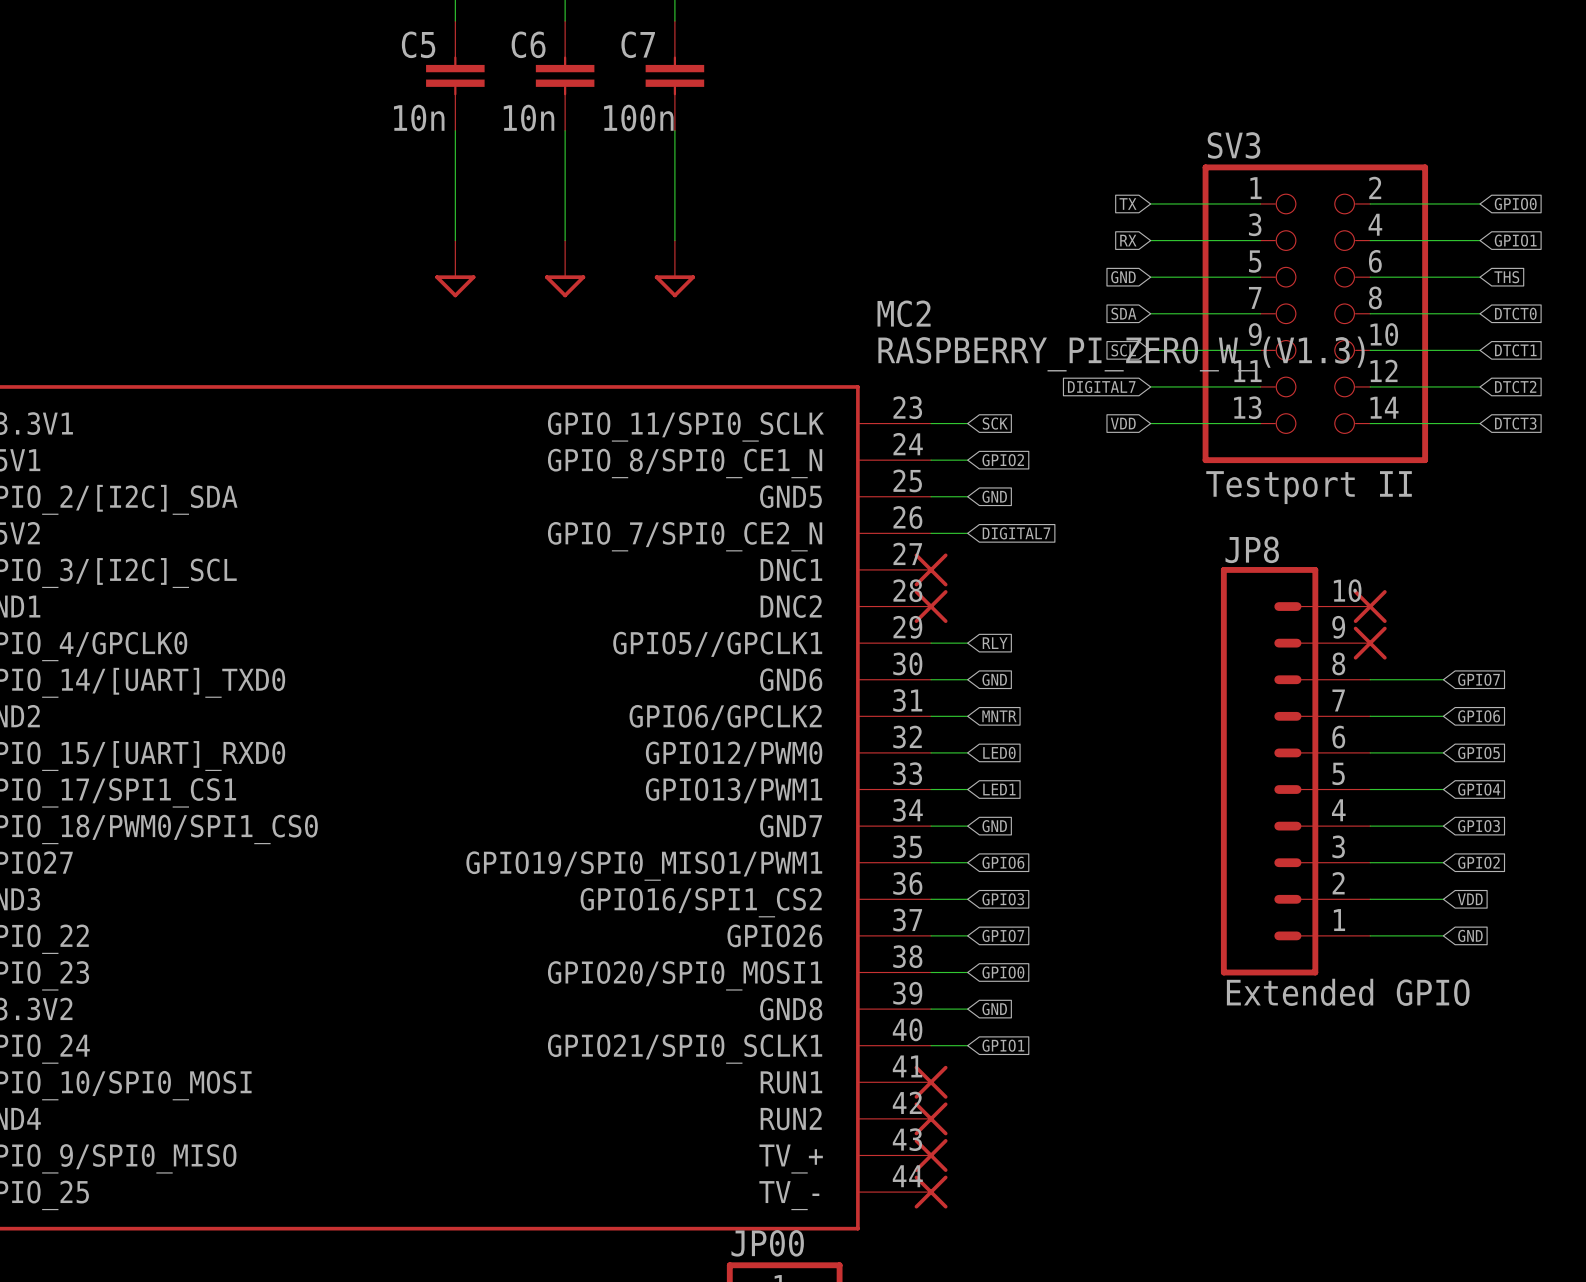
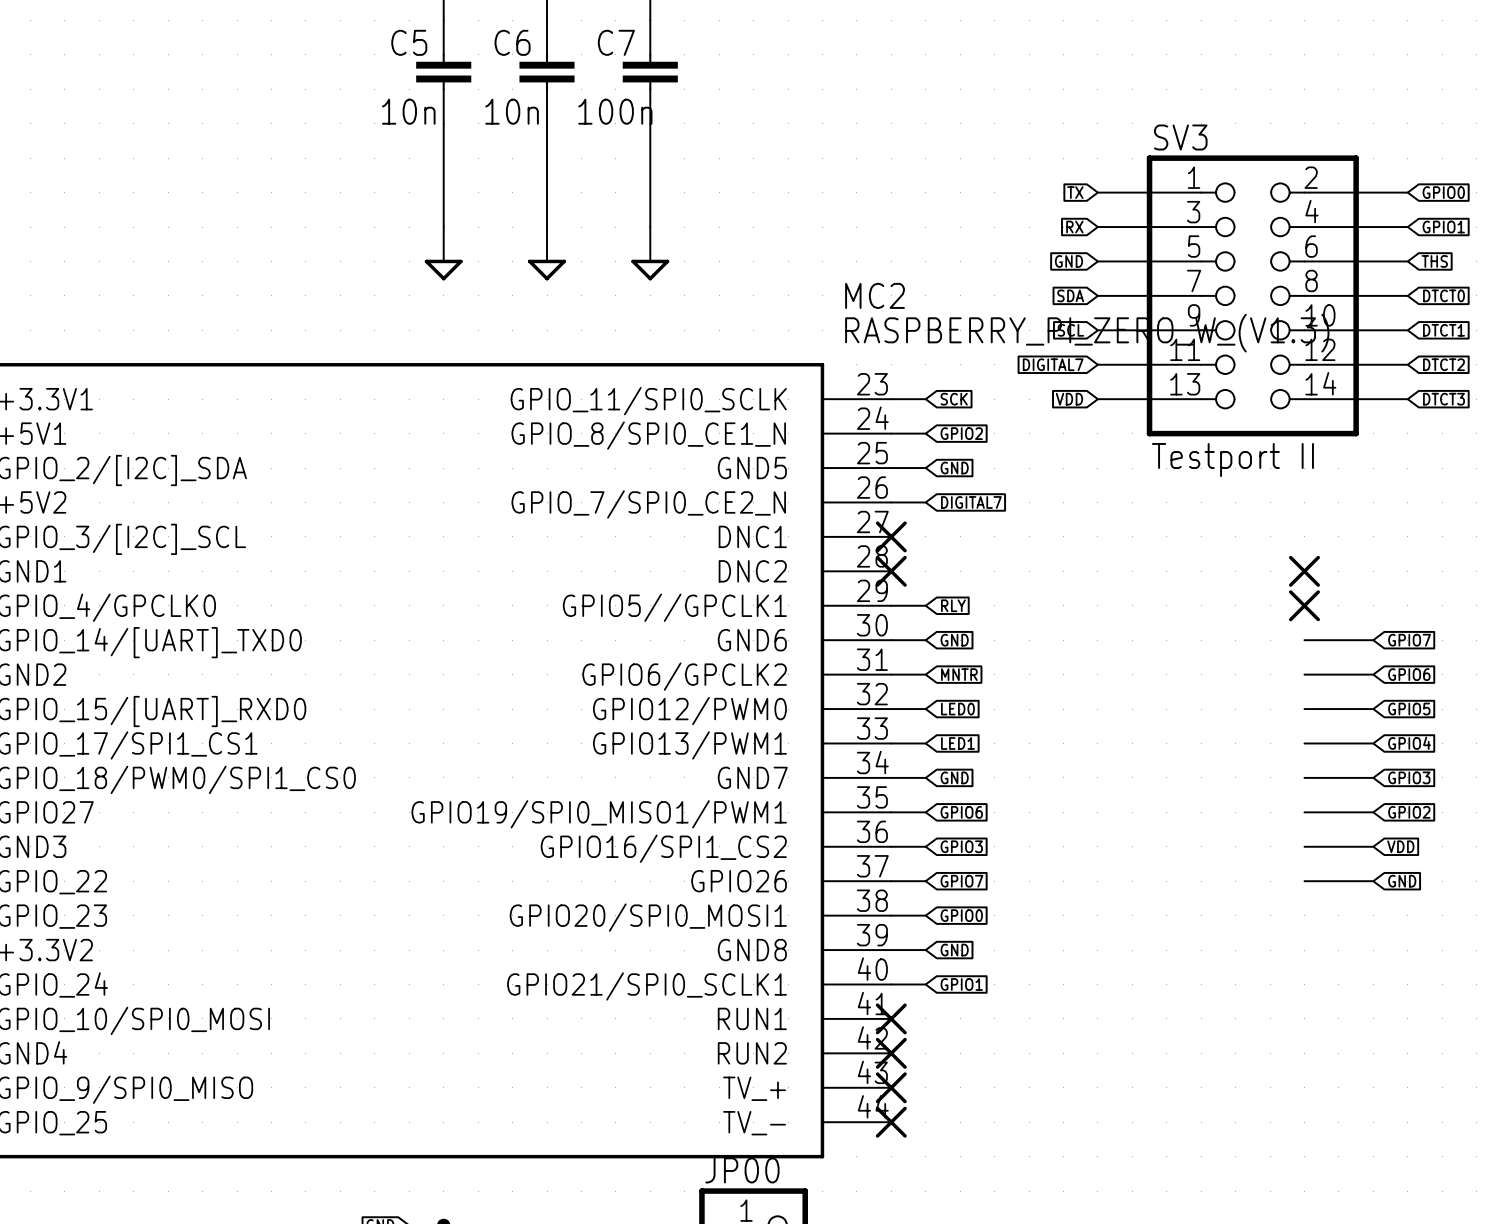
JP8: Extended GPIO (1295, 771) -> none

